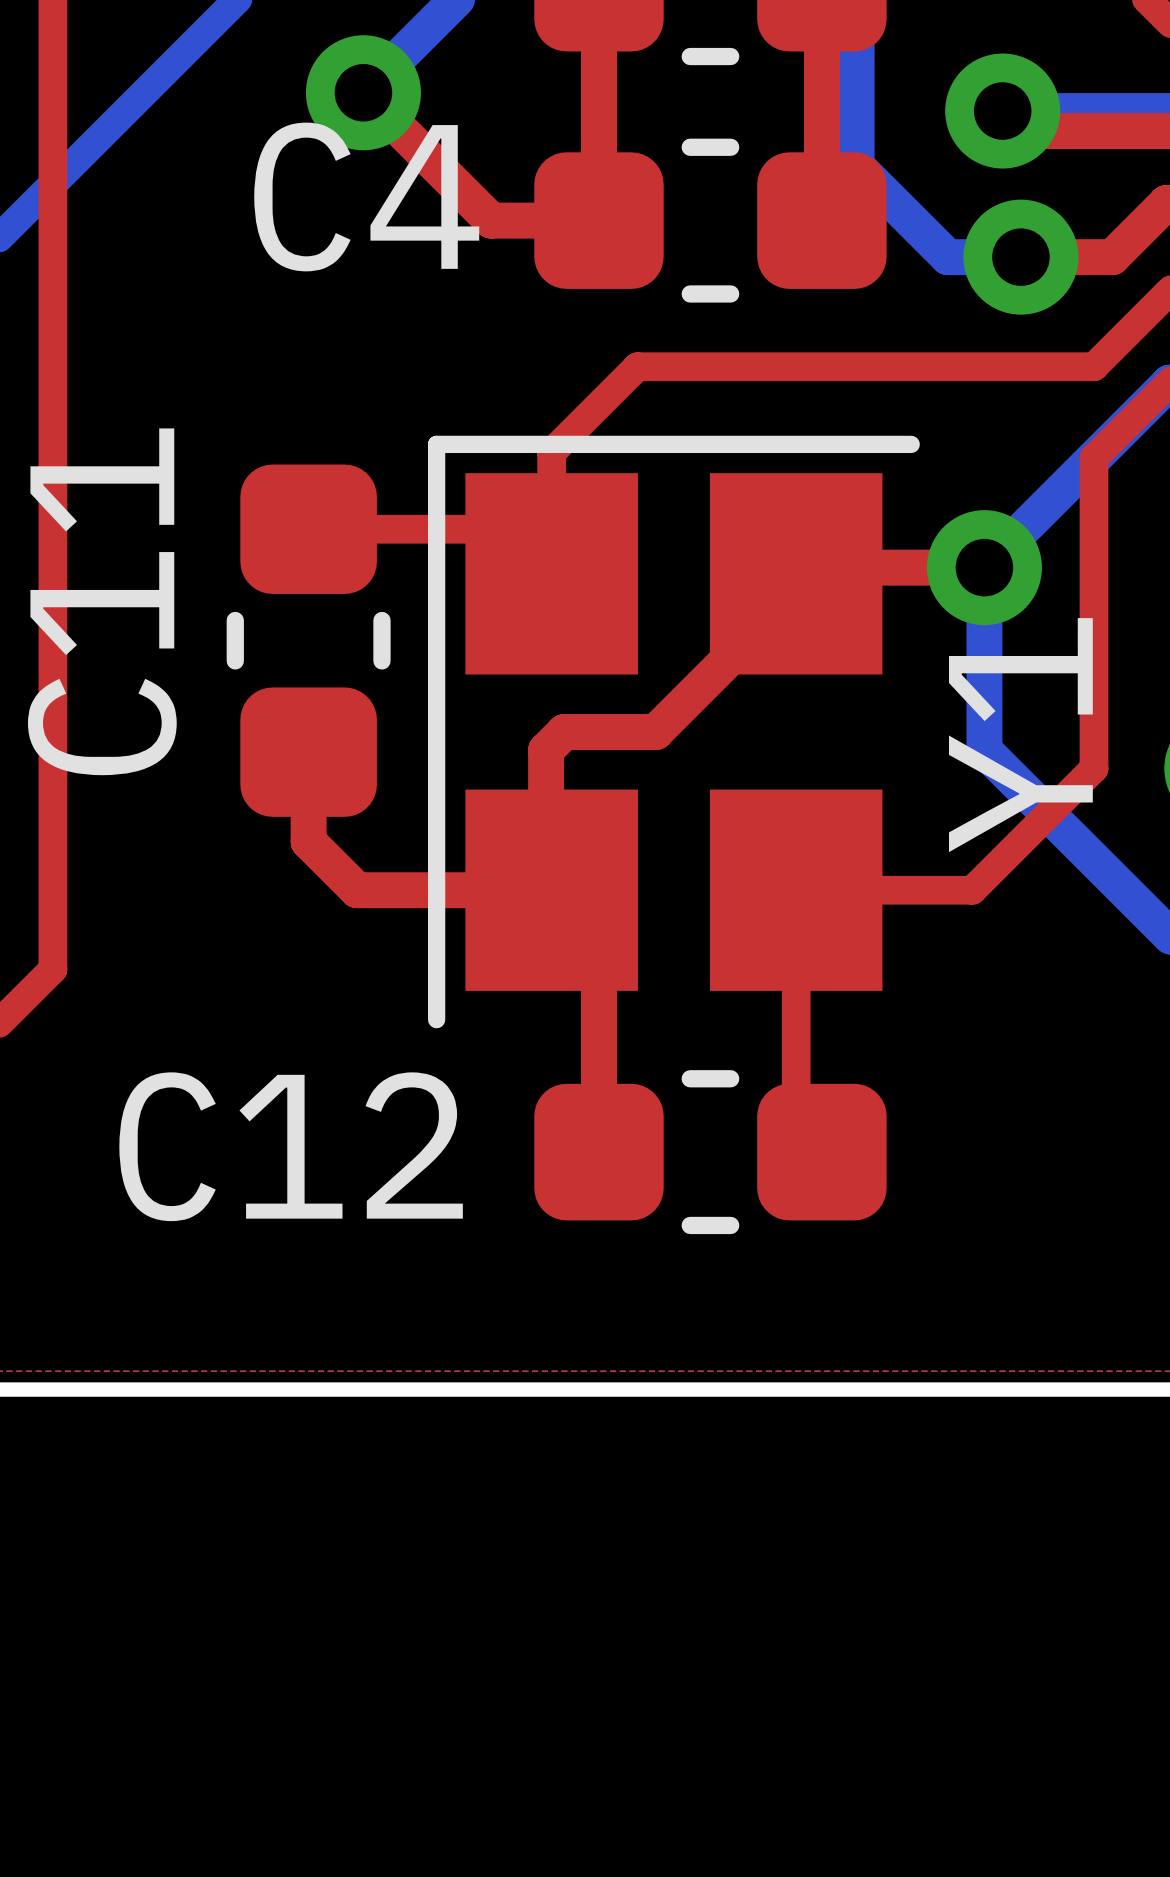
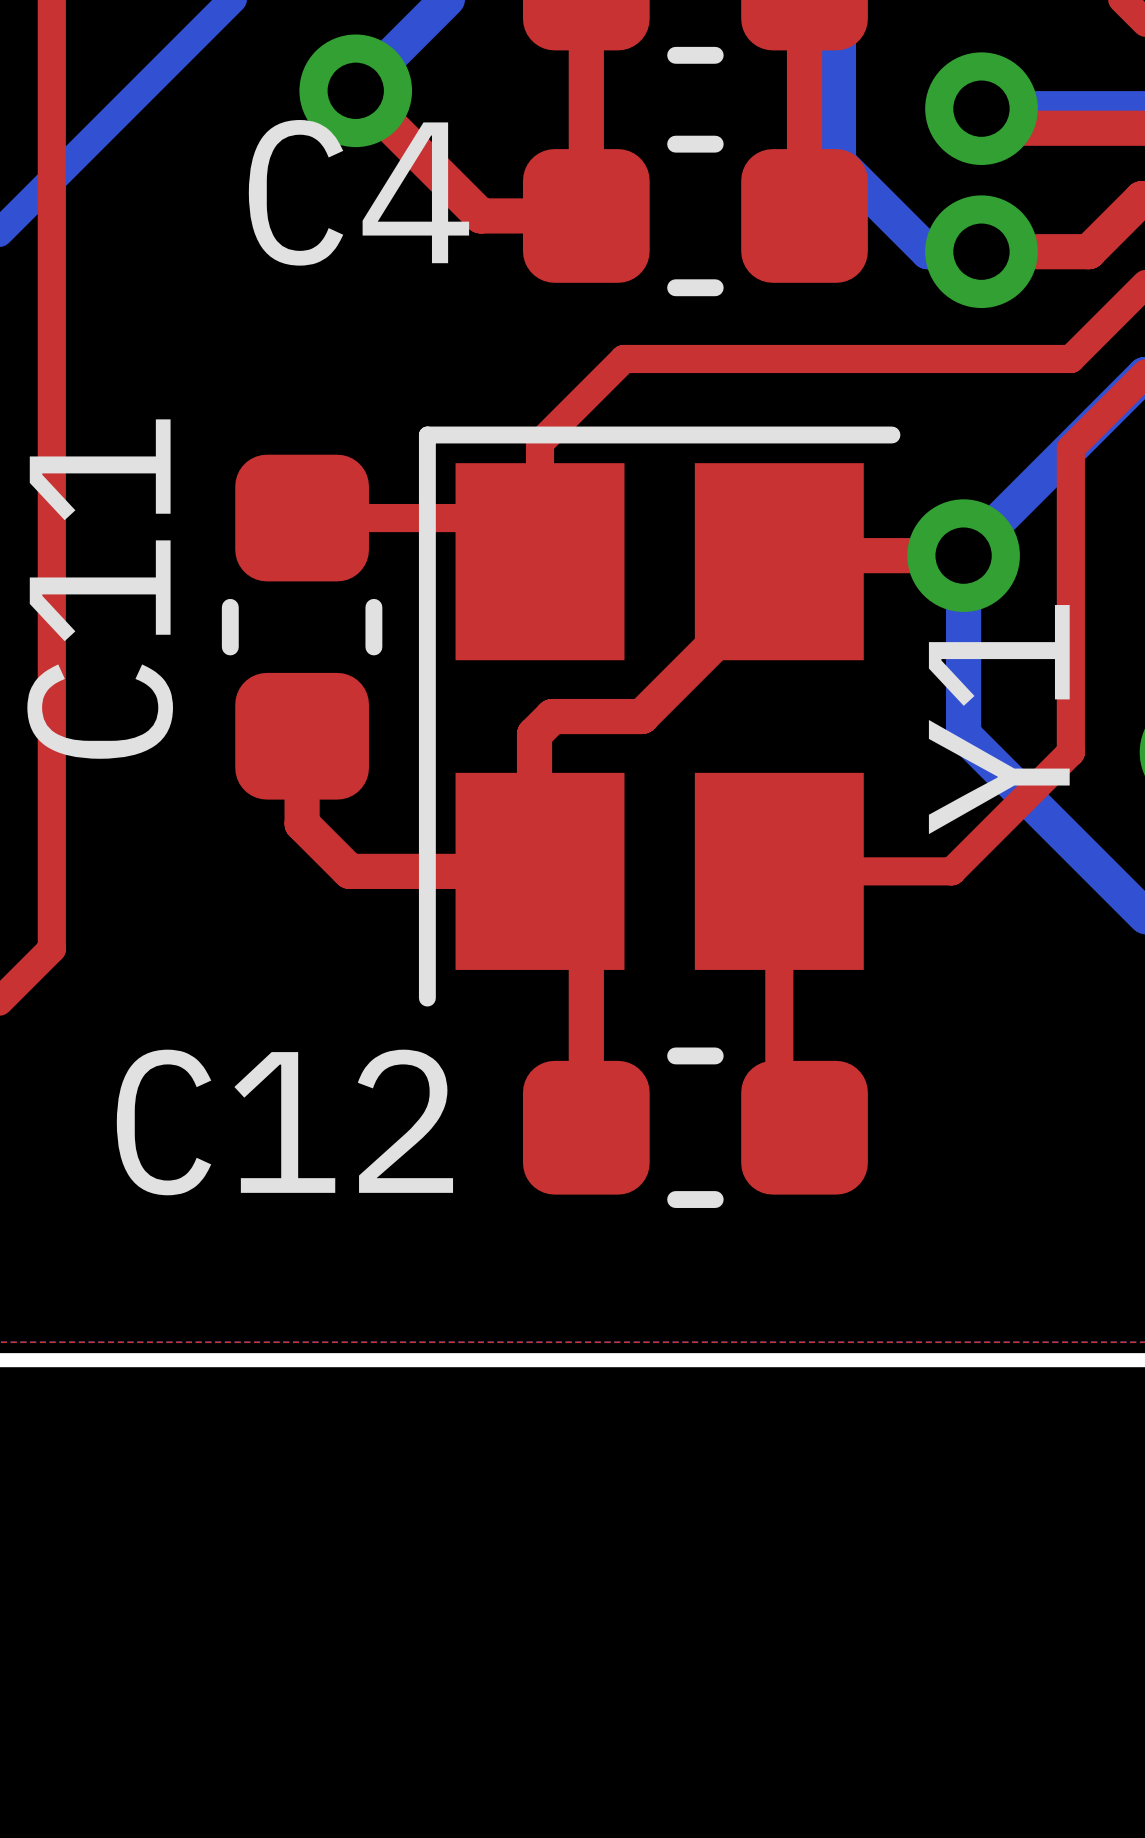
via position: (1020, 257) -> (981, 251)

